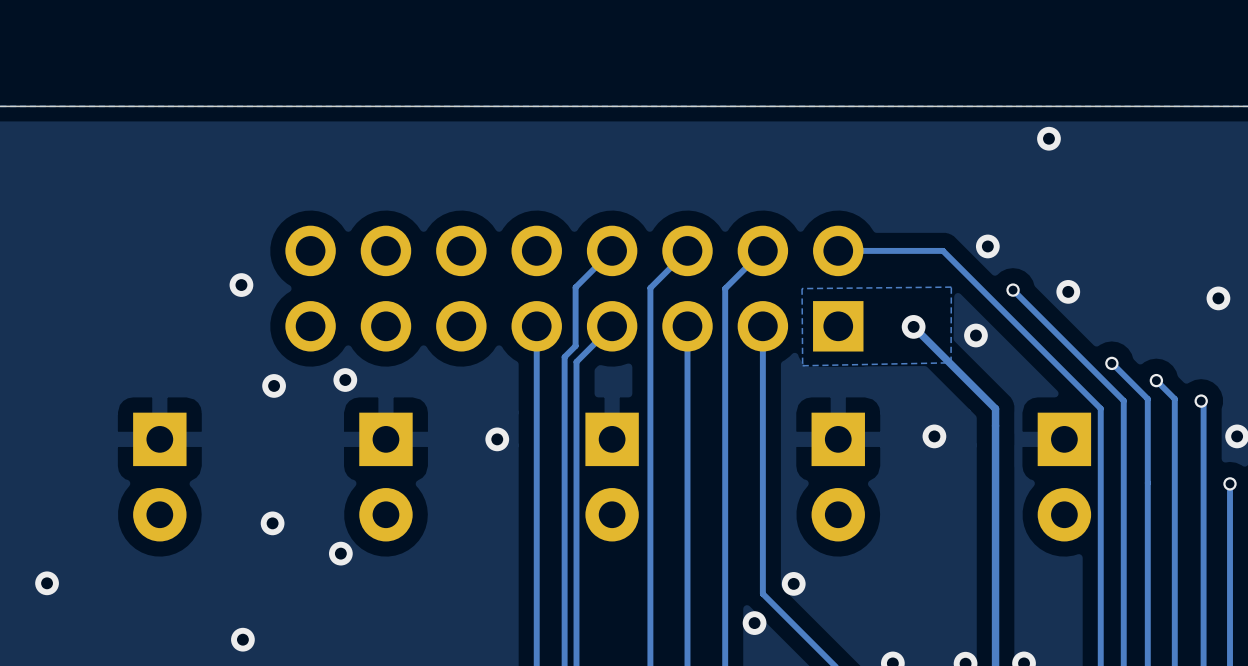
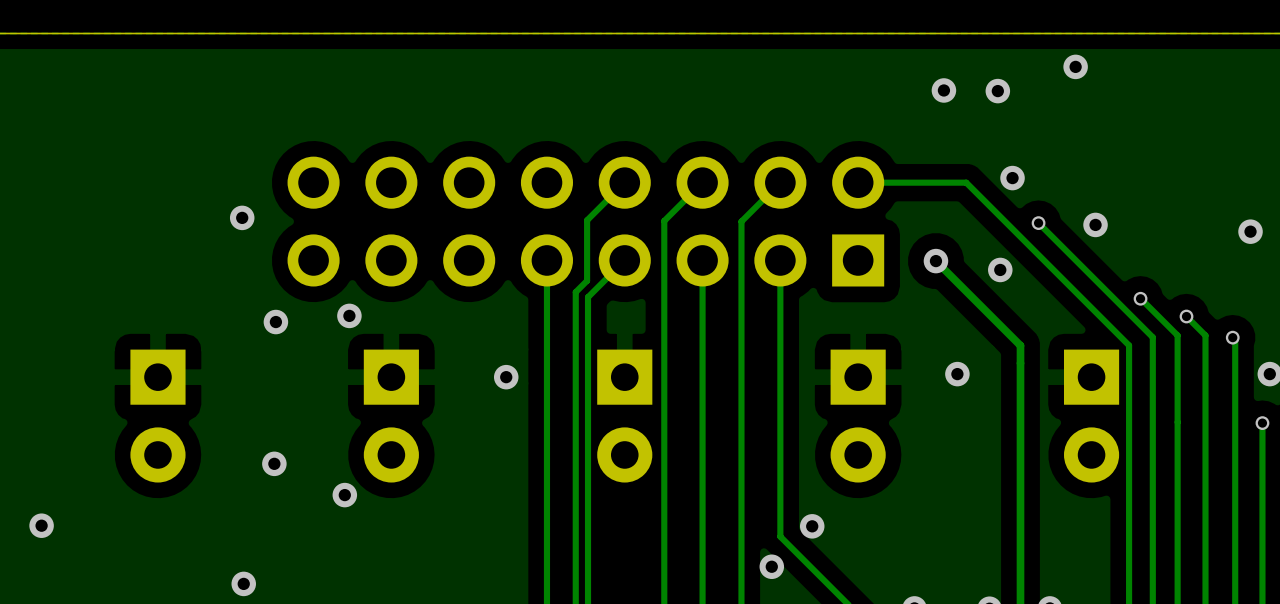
via: none -> (943, 90)
via: none -> (997, 91)
zone outline: (951, 287) (951, 362) (802, 365) (802, 288) (951, 287) -> none

